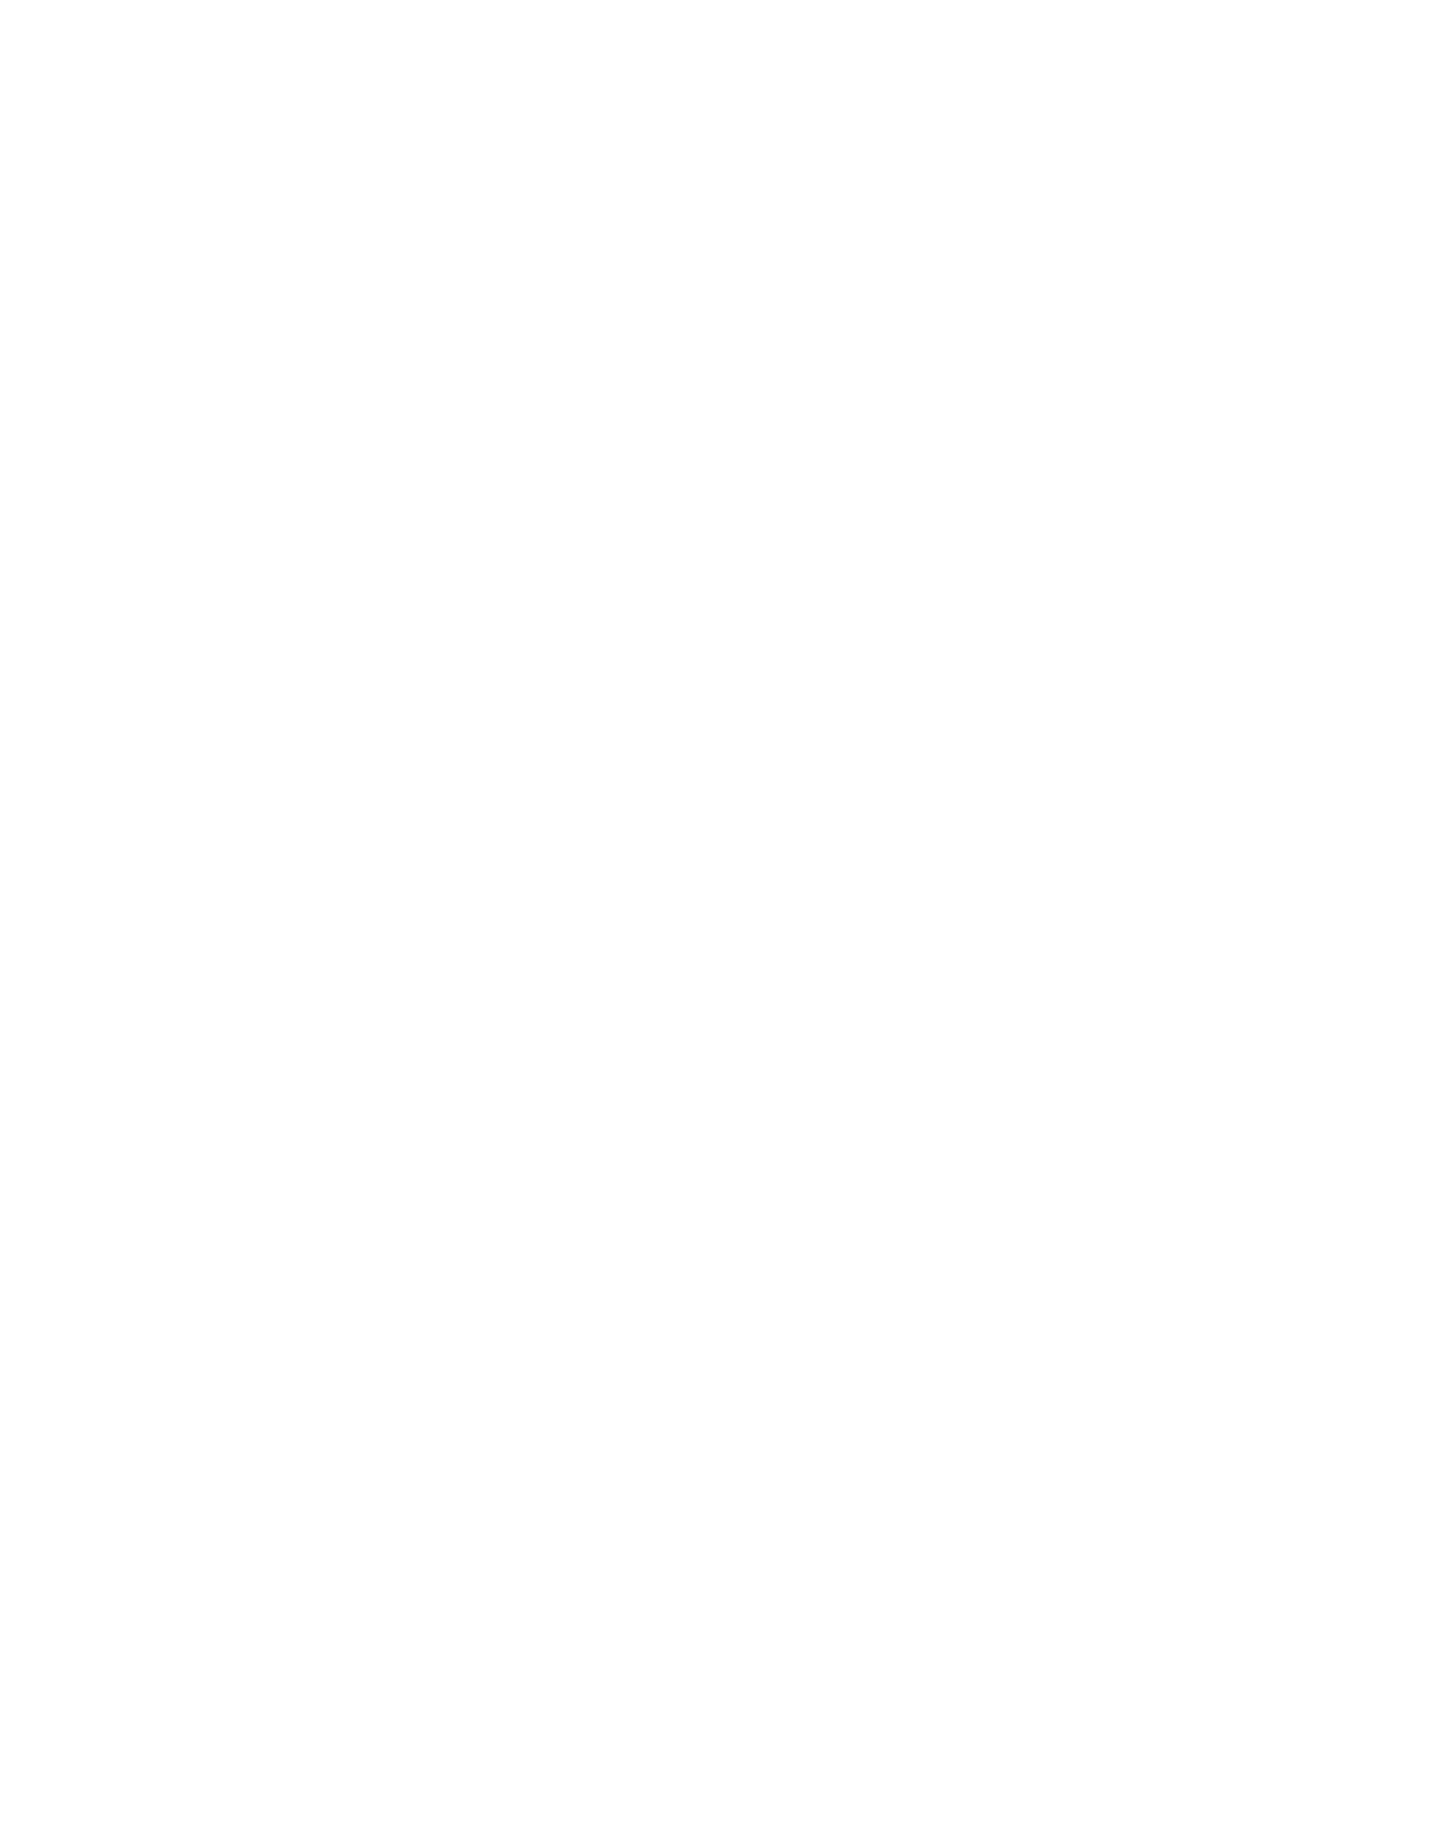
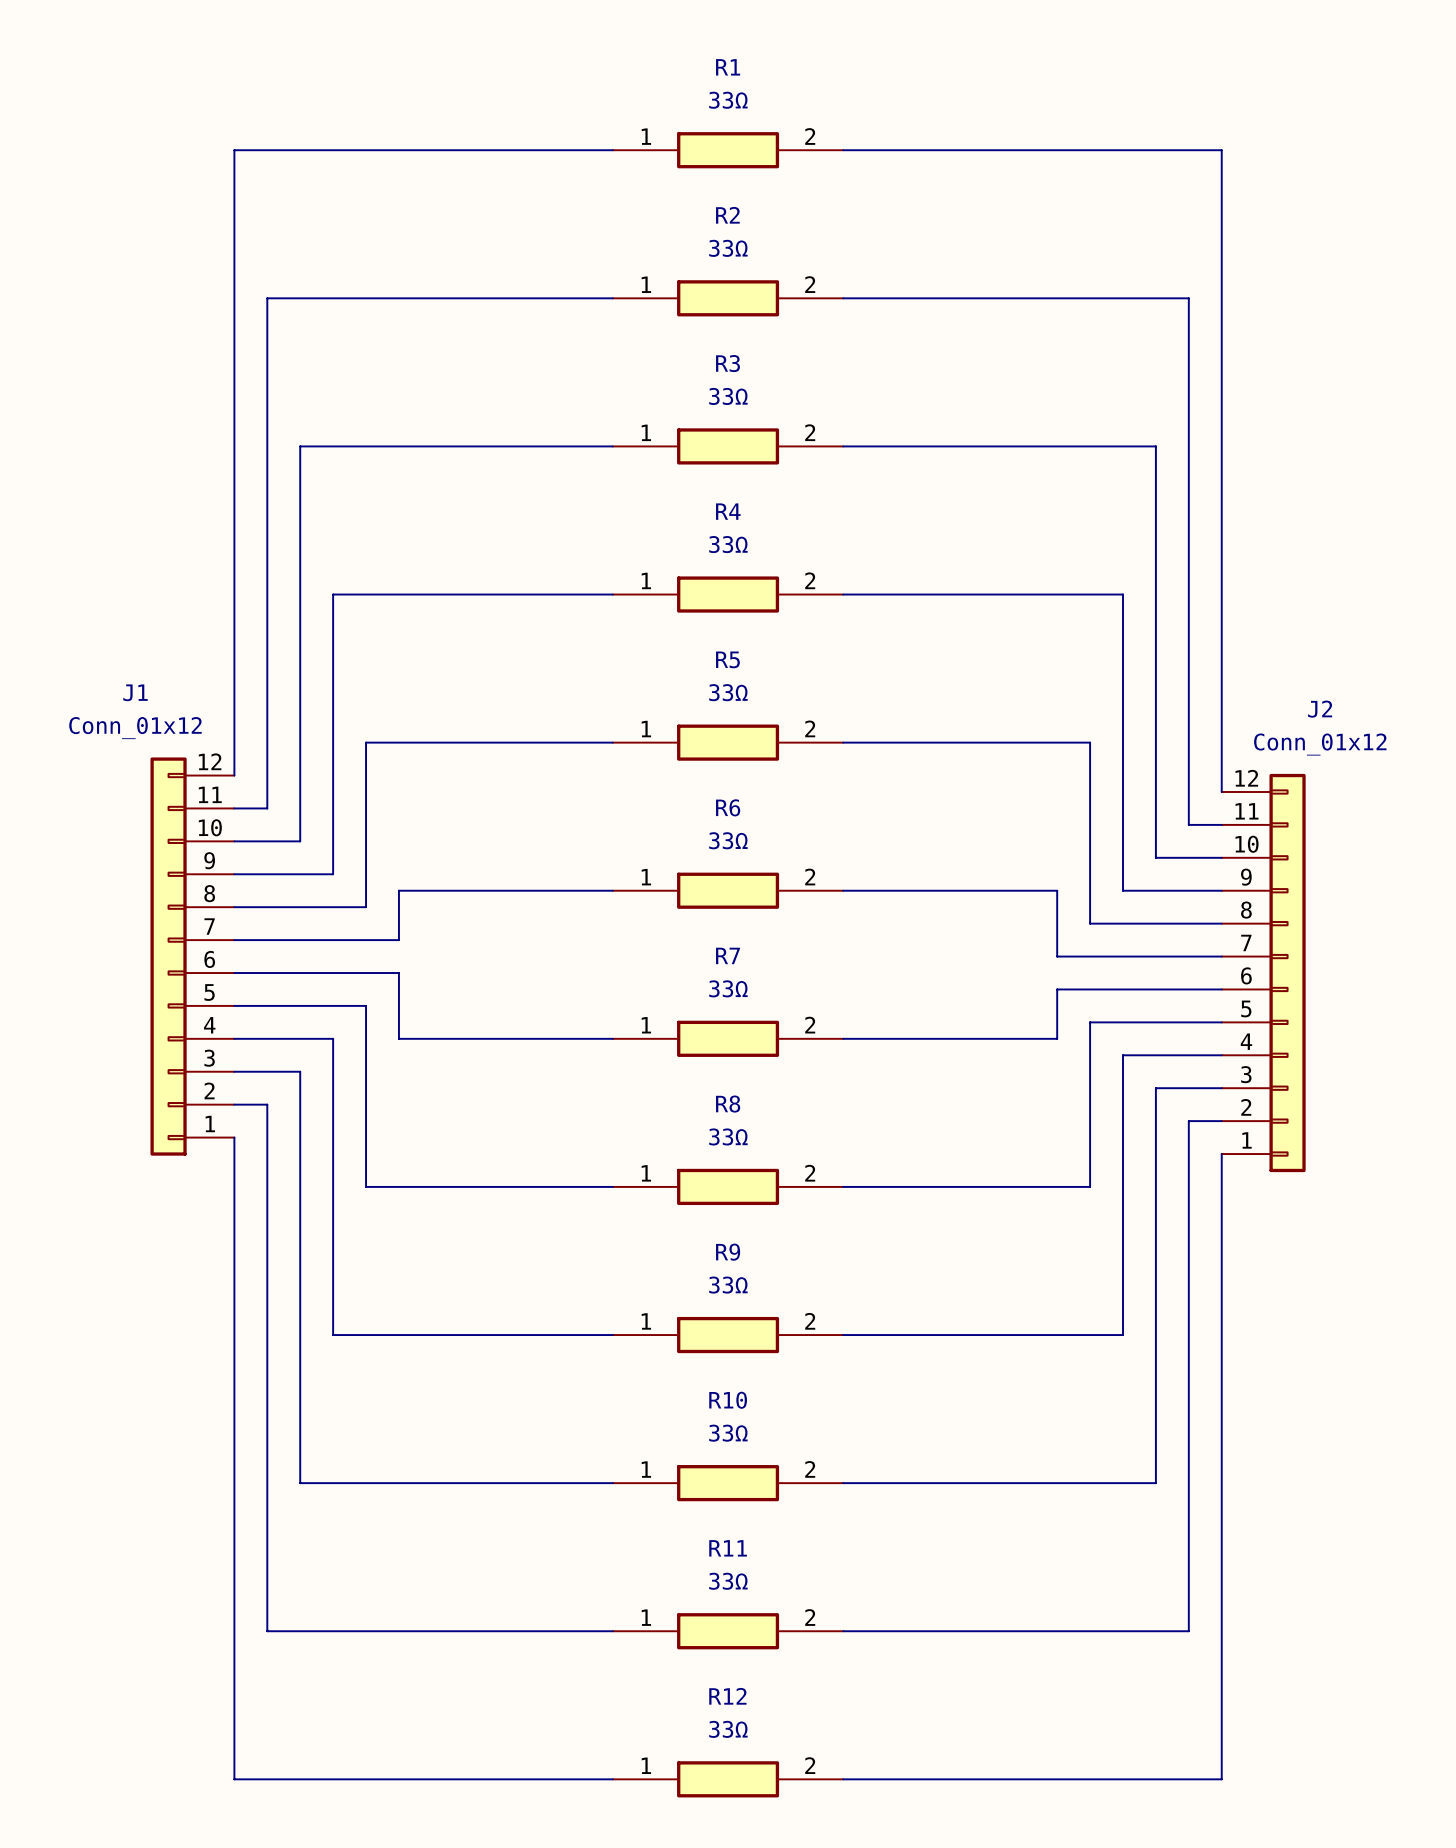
wire: none -> (612, 150) (234, 150) (234, 775)
R1: none -> 33Ω (728, 150)
wire: none -> (843, 150) (1221, 150) (1221, 791)
wire: none -> (612, 298) (267, 298) (267, 808) (234, 808)
R2: none -> 33Ω (728, 298)
wire: none -> (843, 298) (1188, 298) (1188, 824) (1221, 824)
wire: none -> (612, 446) (300, 446) (300, 841) (234, 841)
R3: none -> 33Ω (728, 446)
wire: none -> (843, 446) (1155, 446) (1155, 857) (1221, 857)
wire: none -> (612, 594) (333, 594) (333, 874) (234, 874)
R4: none -> 33Ω (728, 594)
wire: none -> (843, 594) (1123, 594) (1123, 890) (1221, 890)
wire: none -> (612, 742) (366, 742) (366, 907) (234, 907)
R5: none -> 33Ω (728, 742)
wire: none -> (843, 742) (1090, 742) (1090, 923) (1221, 923)
wire: none -> (612, 890) (398, 890) (398, 940) (234, 940)
R6: none -> 33Ω (728, 890)
wire: none -> (843, 890) (1057, 890) (1057, 956) (1221, 956)
J1: none -> Conn_01x12 (192, 956)
wire: none -> (234, 973) (398, 973) (398, 1038) (612, 1038)
J2: none -> Conn_01x12 (1263, 973)
wire: none -> (1221, 989) (1057, 989) (1057, 1038) (843, 1038)
wire: none -> (234, 1005) (366, 1005) (366, 1186) (612, 1186)
wire: none -> (1221, 1022) (1090, 1022) (1090, 1186) (843, 1186)
wire: none -> (234, 1038) (333, 1038) (333, 1335) (612, 1335)
R7: none -> 33Ω (728, 1038)
wire: none -> (1221, 1055) (1123, 1055) (1123, 1335) (843, 1335)
wire: none -> (234, 1071) (300, 1071) (300, 1483) (612, 1483)
wire: none -> (1221, 1088) (1155, 1088) (1155, 1483) (843, 1483)
wire: none -> (234, 1104) (267, 1104) (267, 1631) (612, 1631)
wire: none -> (1221, 1121) (1188, 1121) (1188, 1631) (843, 1631)
wire: none -> (234, 1137) (234, 1779) (612, 1779)
wire: none -> (1221, 1154) (1221, 1779) (843, 1779)
R8: none -> 33Ω (728, 1186)
R9: none -> 33Ω (728, 1335)
R10: none -> 33Ω (728, 1483)
R11: none -> 33Ω (728, 1631)
R12: none -> 33Ω (728, 1779)

